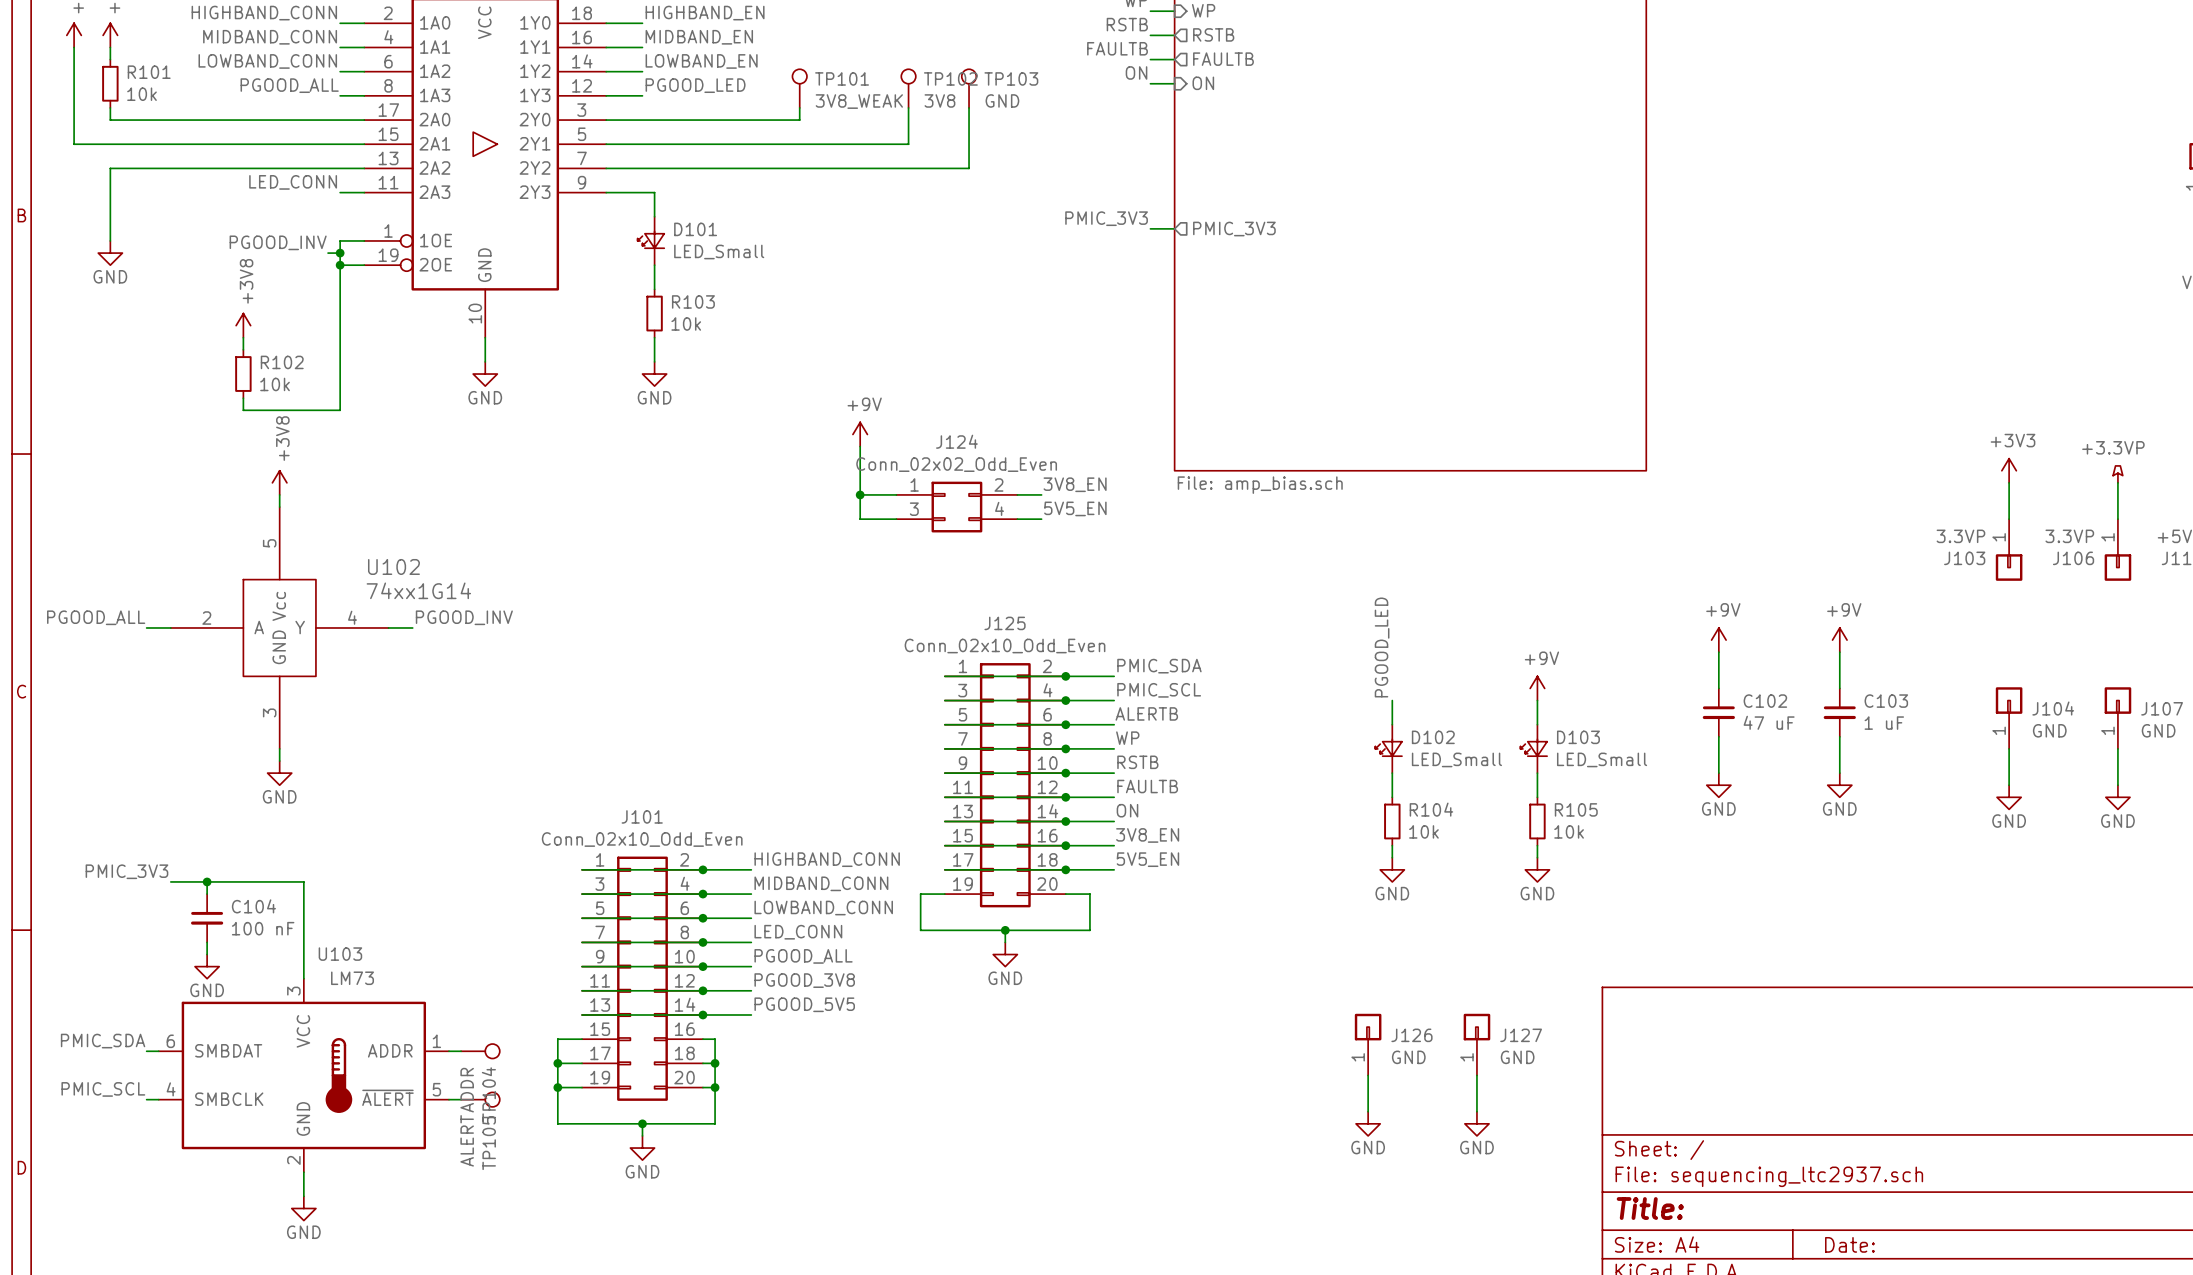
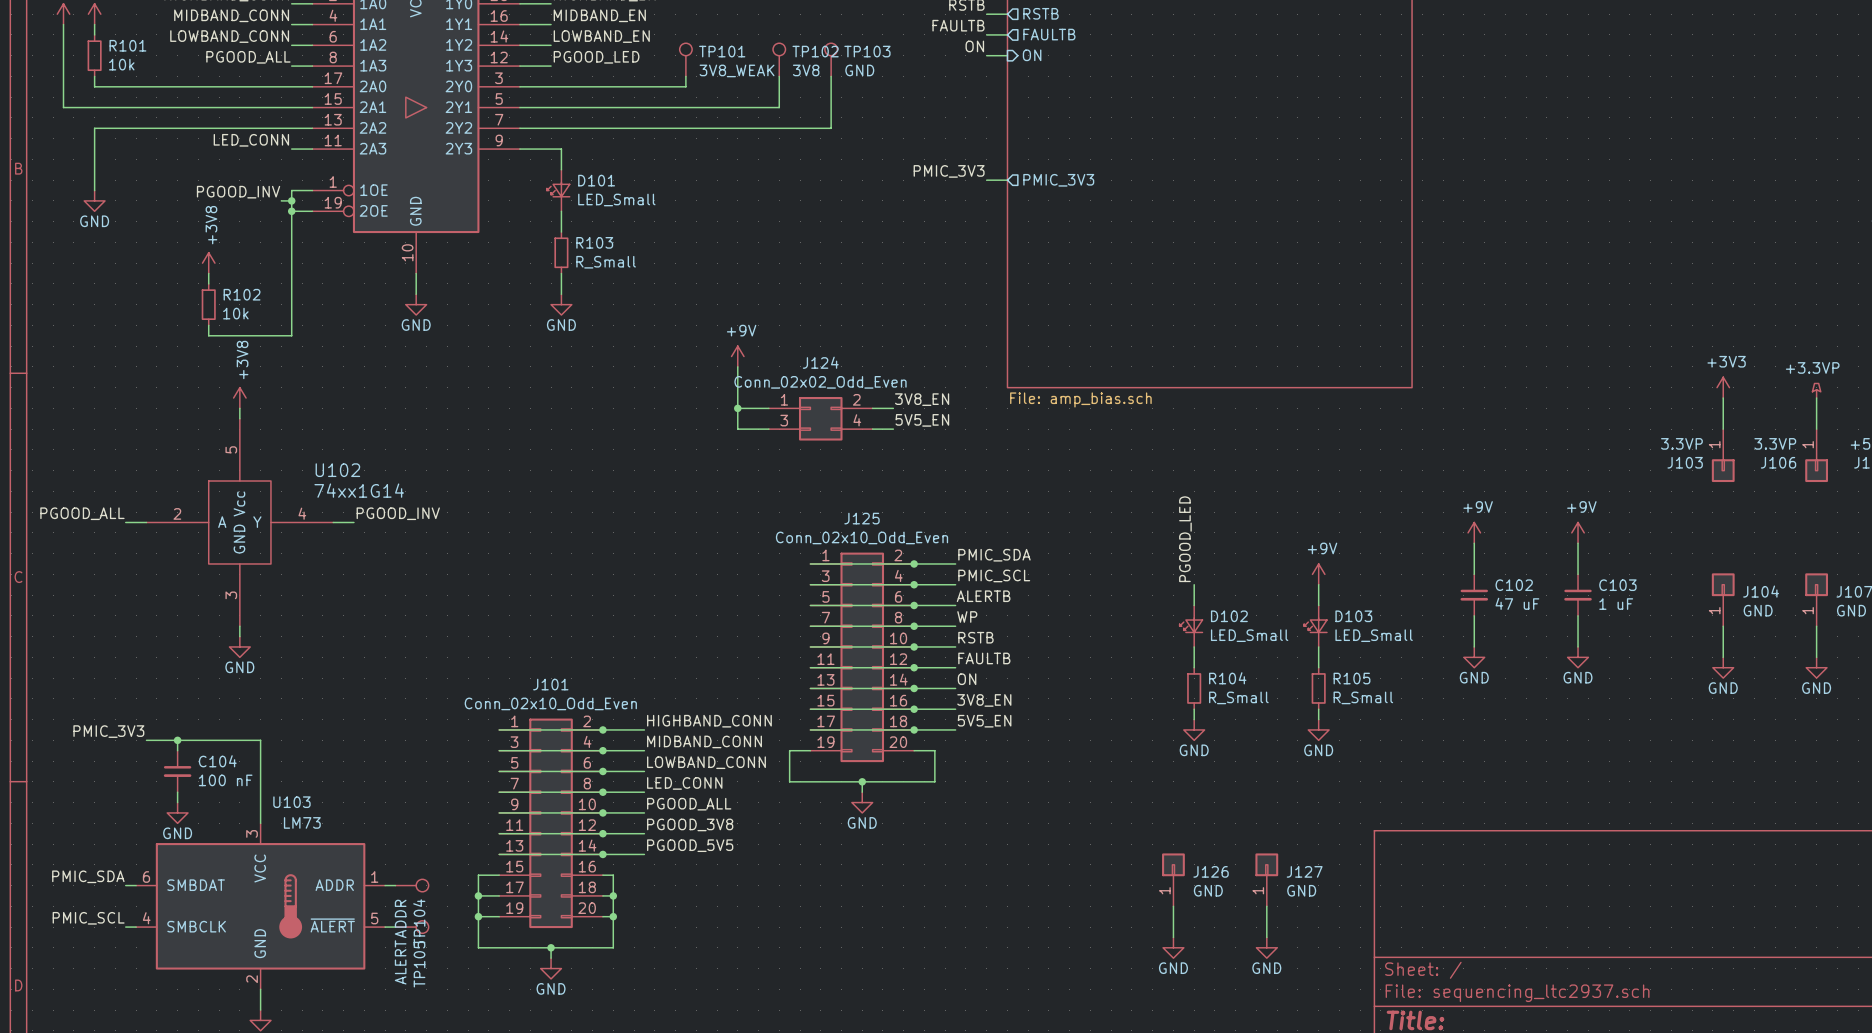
R103 value: 10k (686, 323) -> R_Small (606, 262)
R104 value: 10k (1423, 831) -> R_Small (1238, 697)
R105 value: 10k (1569, 831) -> R_Small (1363, 697)

